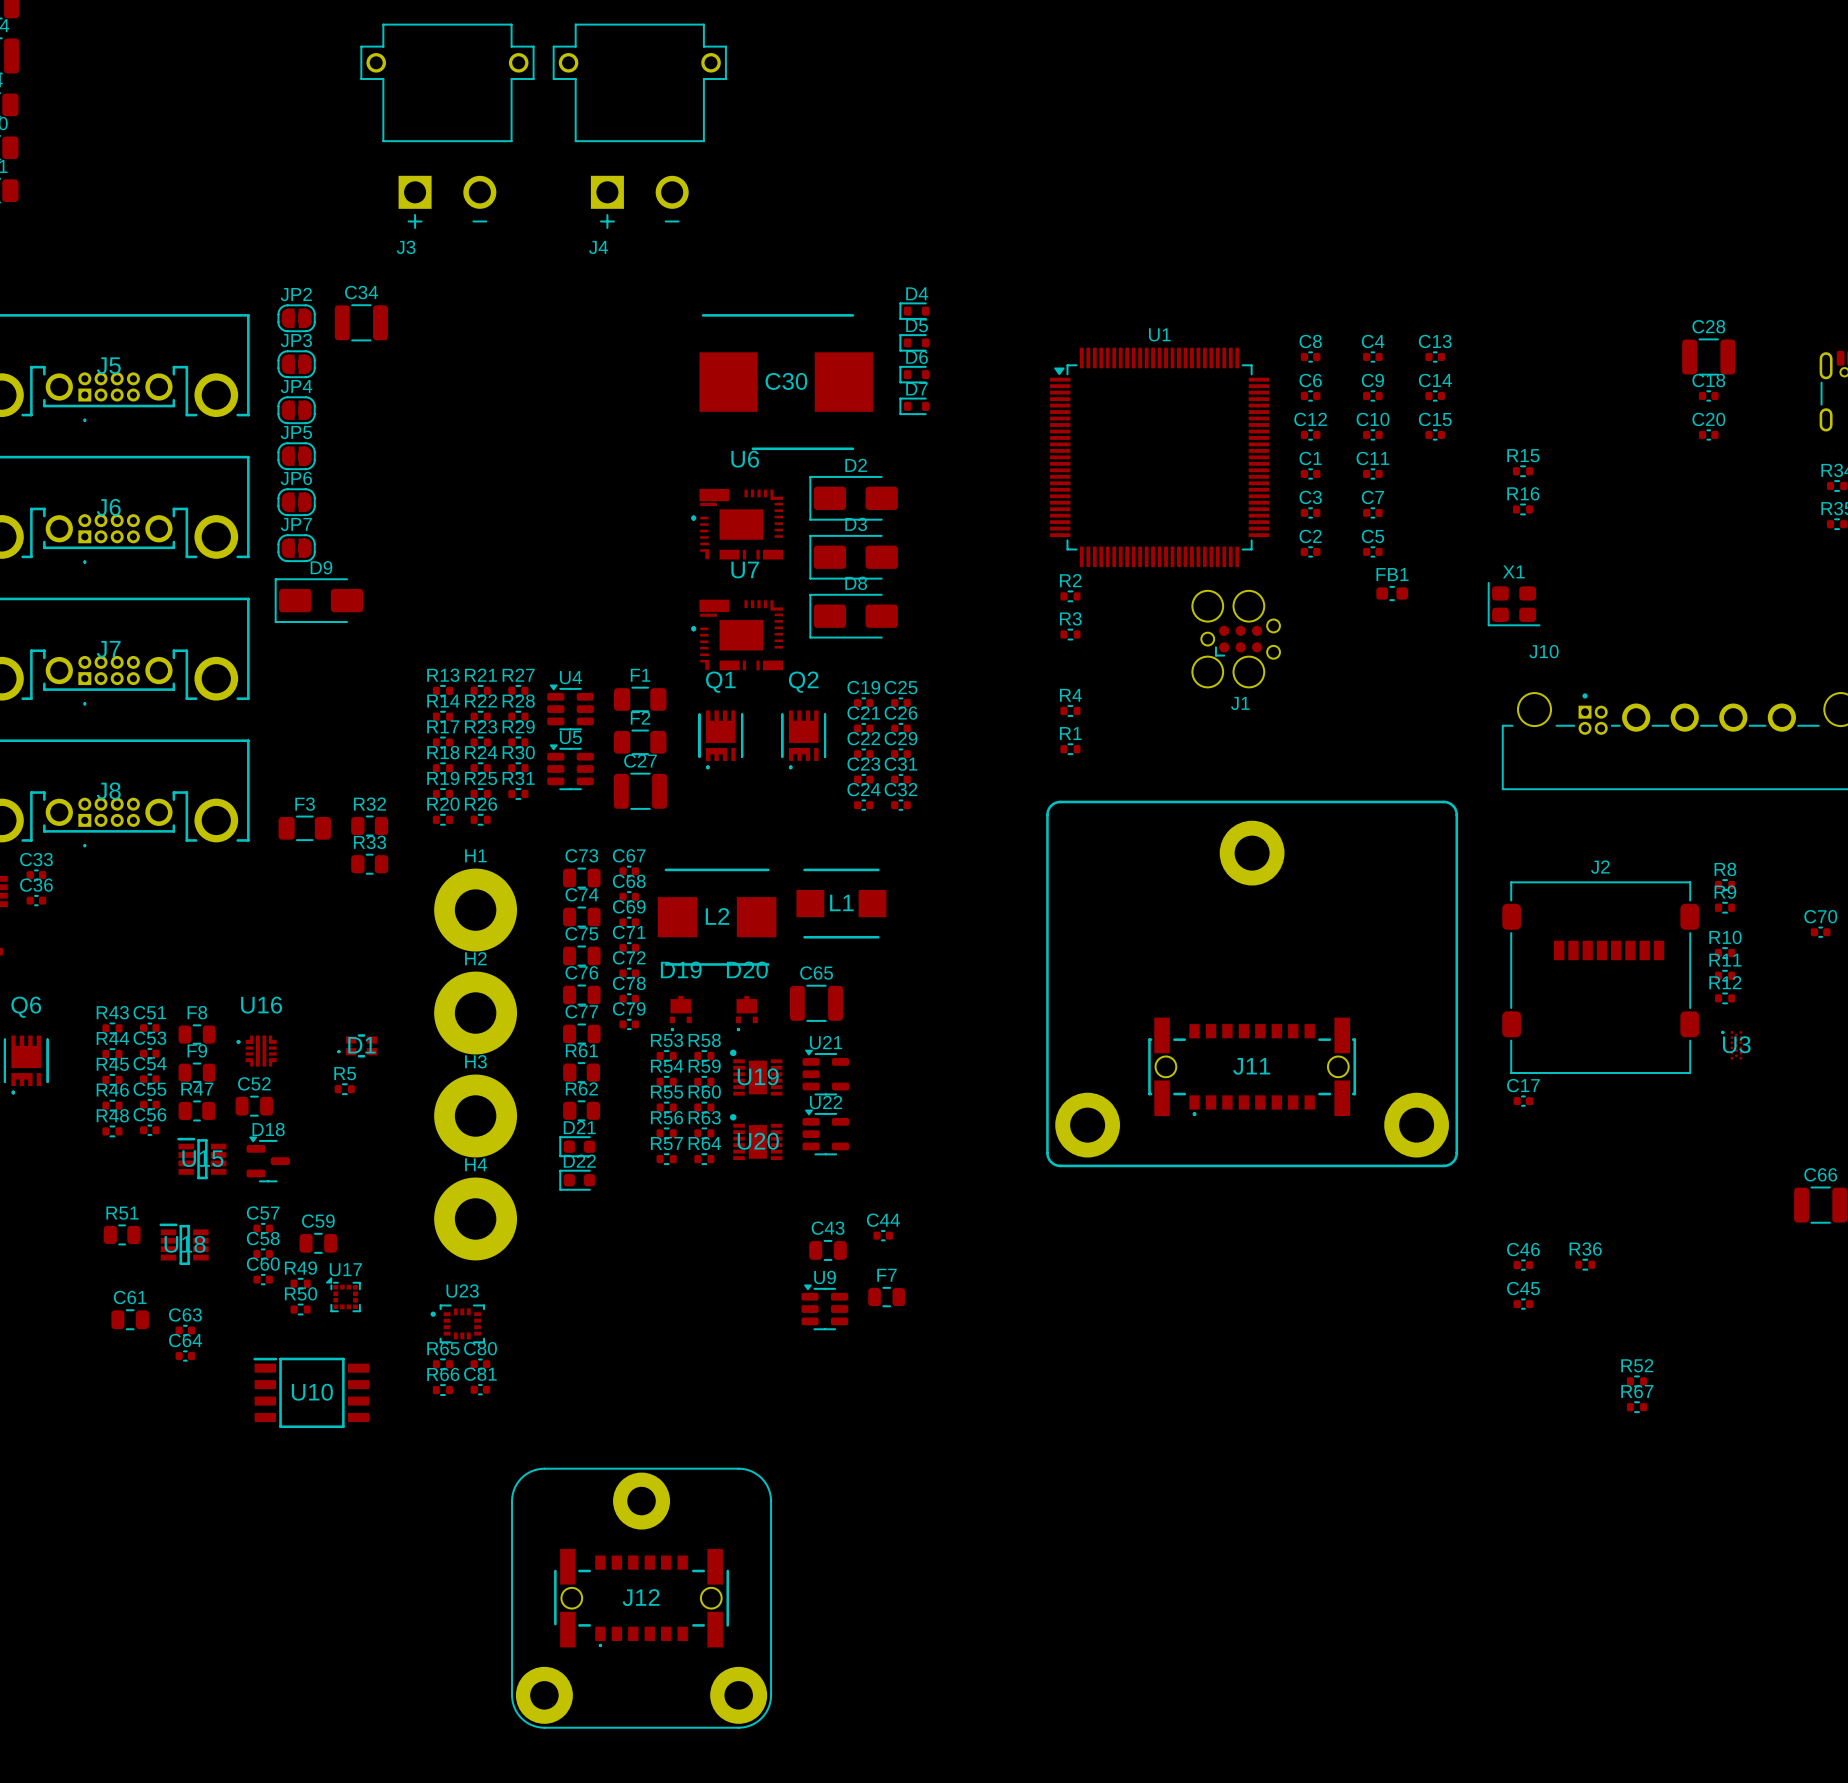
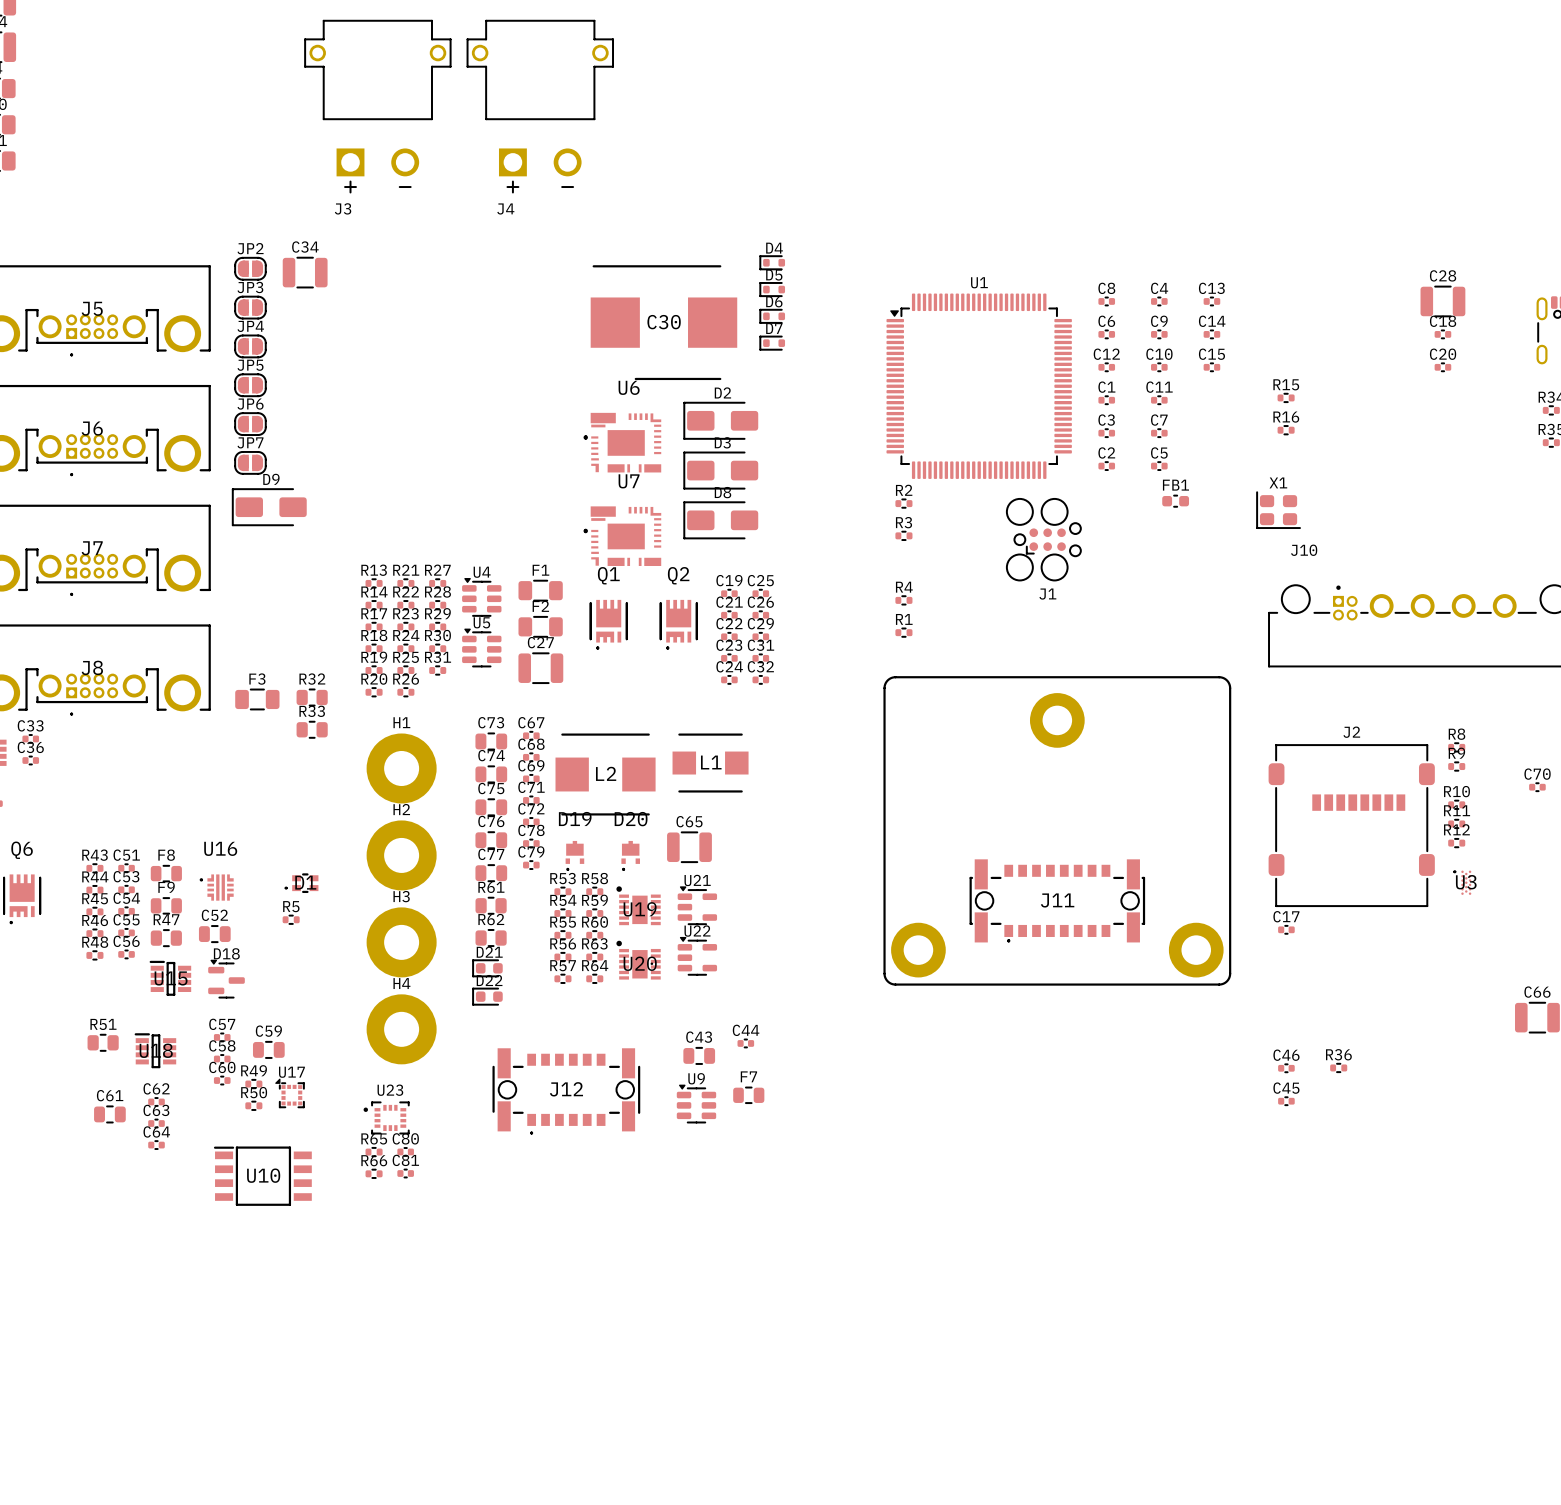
C62: none -> (156, 1101)
R52: (1636, 1381) -> none
R67: (1636, 1407) -> none
J12 footprint: [511, 1468, 772, 1729] -> [492, 1048, 641, 1135]

